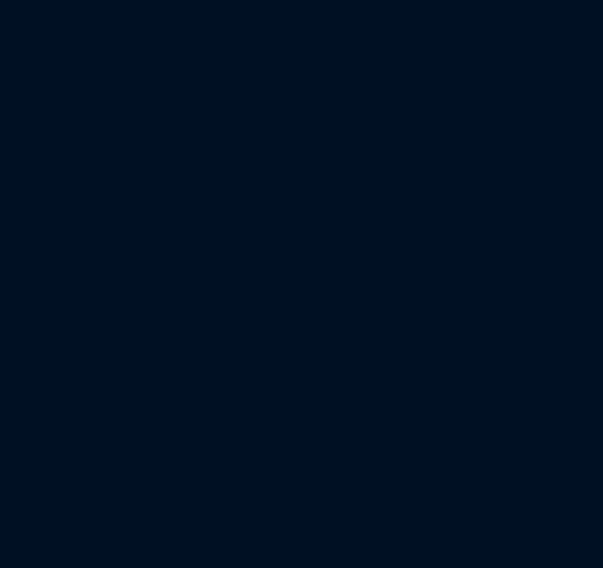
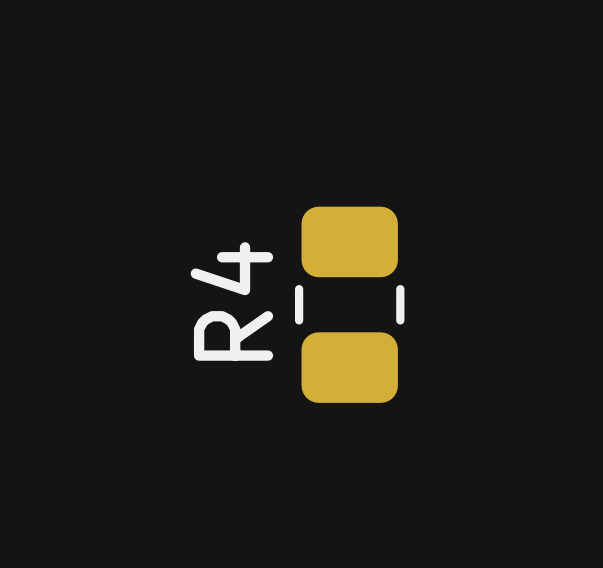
R4: none -> (349, 304)

